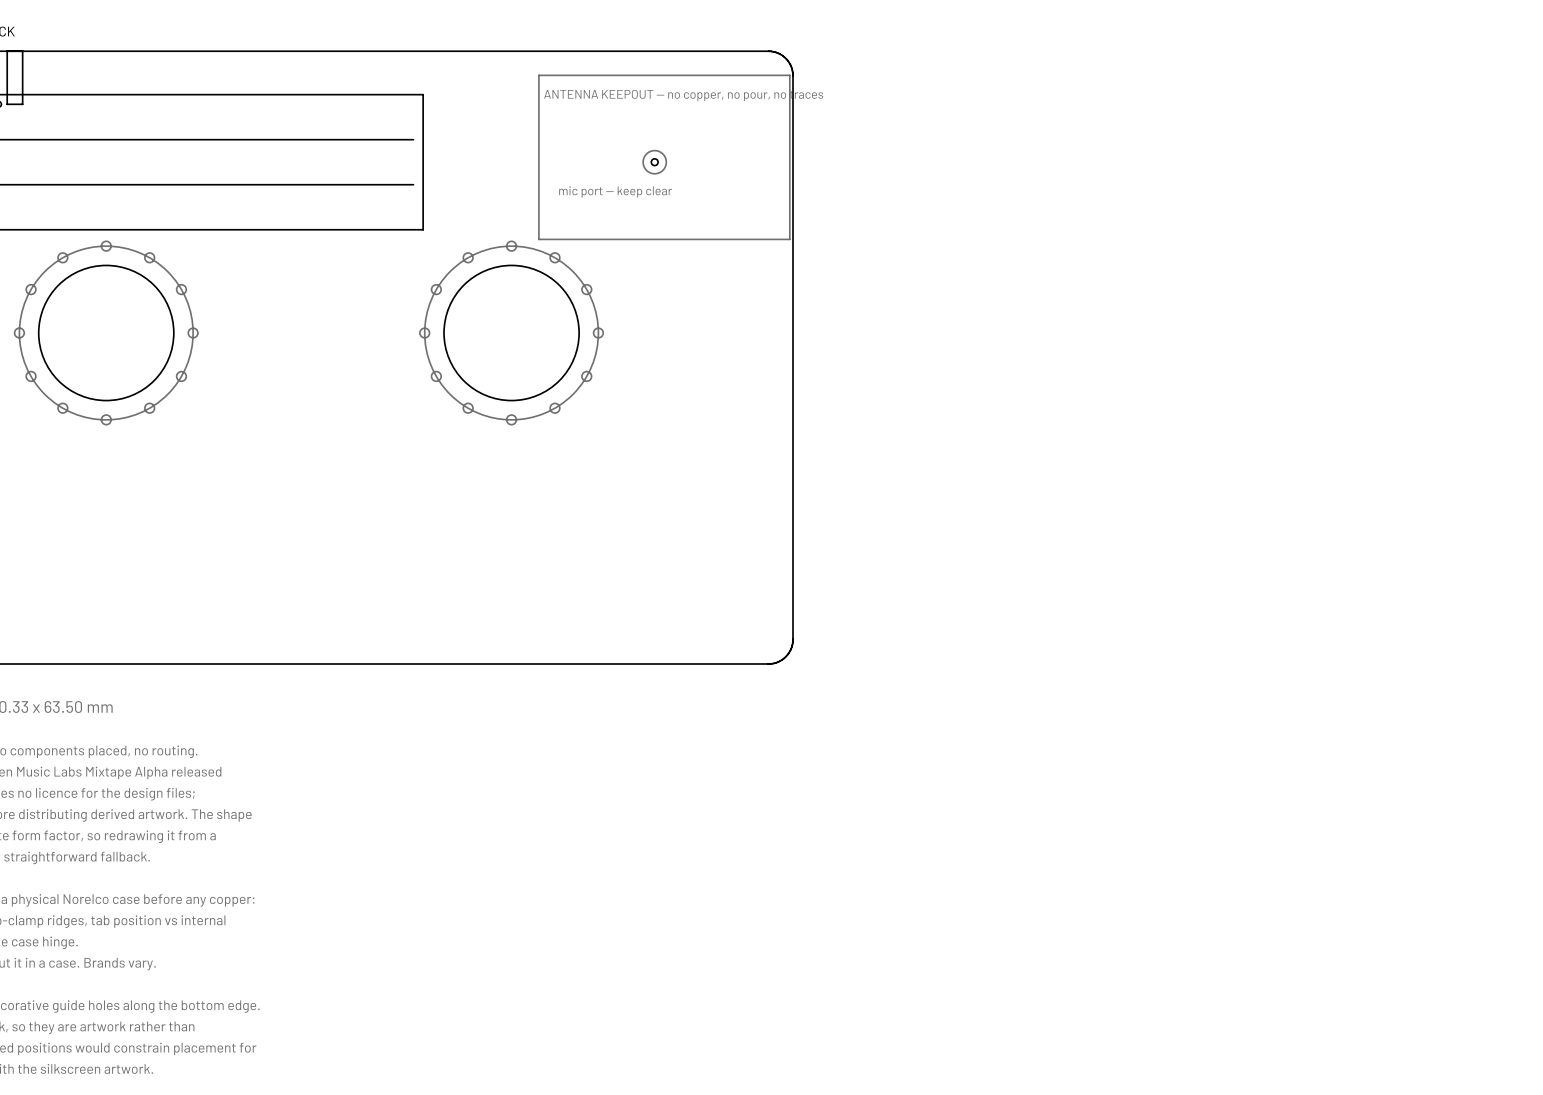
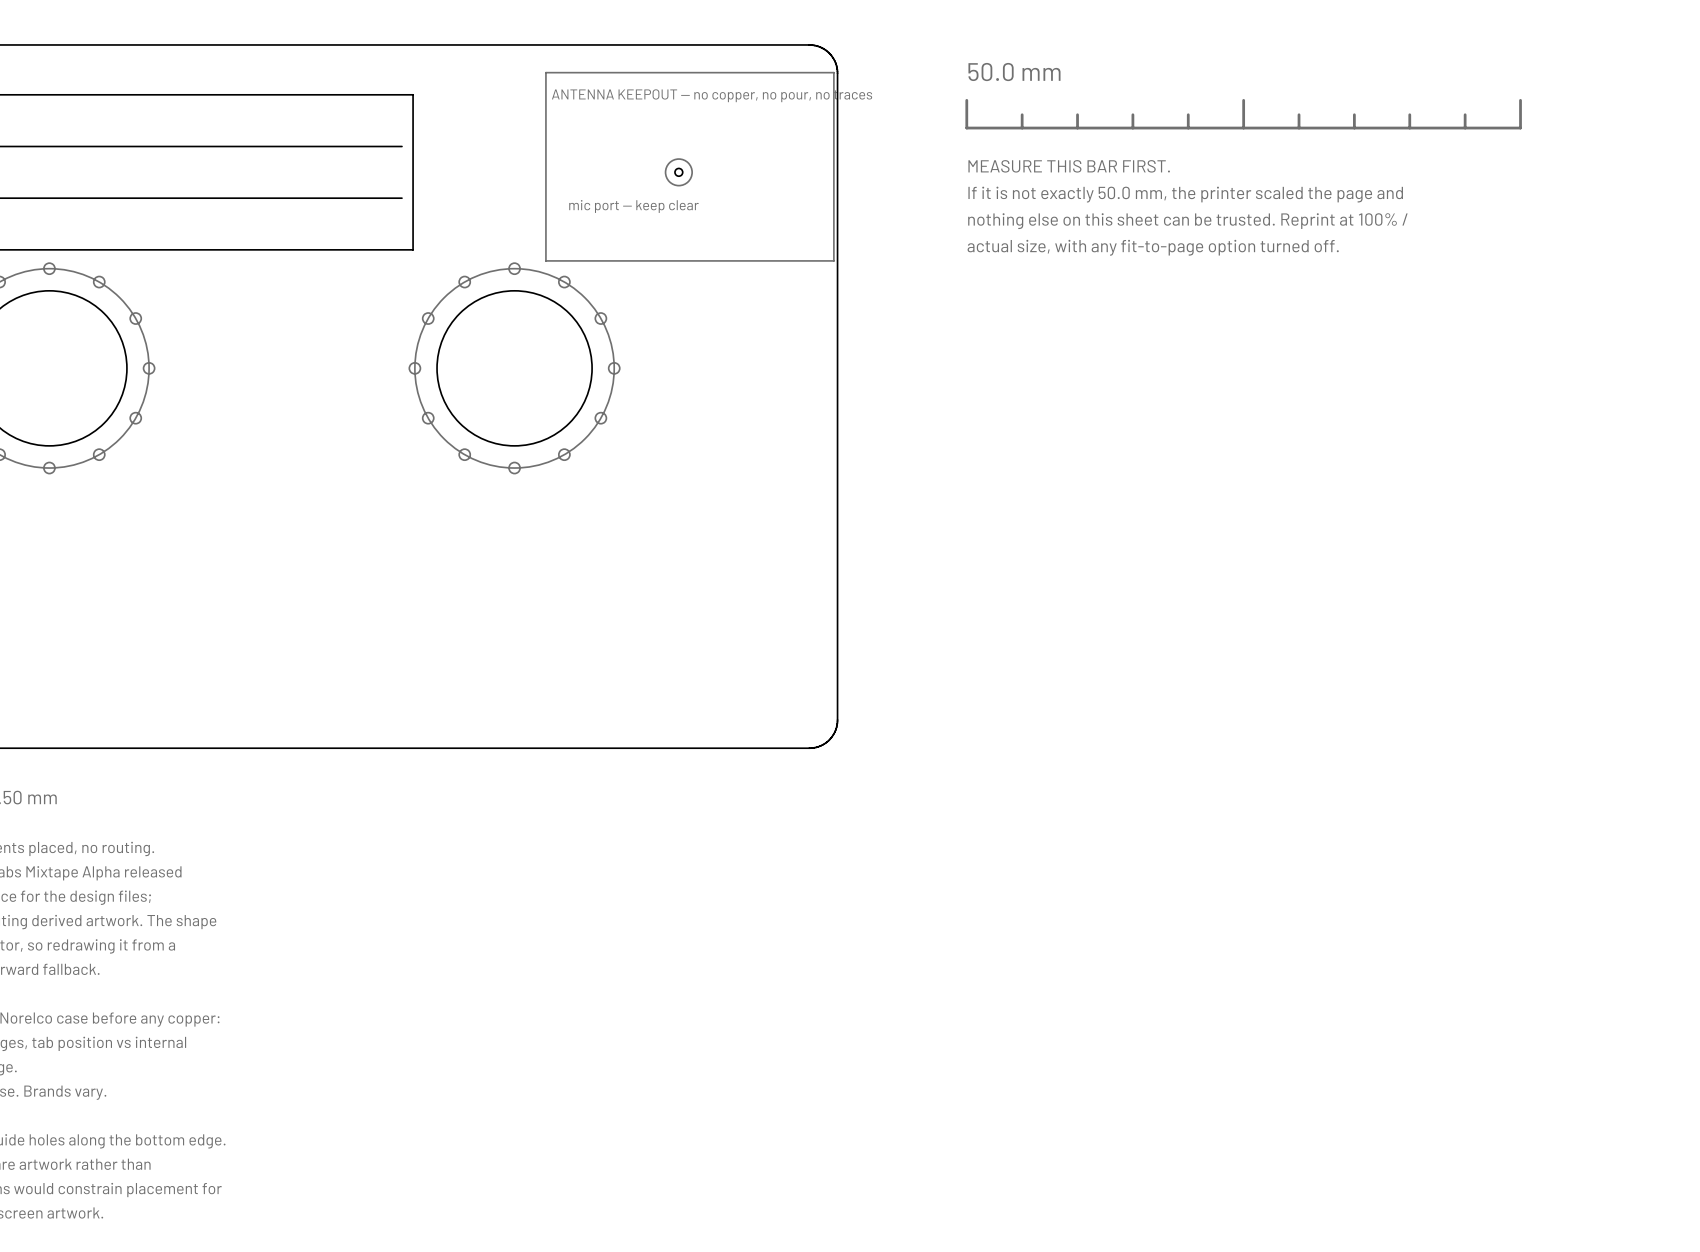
text: none -> 50.0 mm (1014, 72)
line: none -> (966, 100) (966, 128) (1520, 128) (1520, 100)
line: none -> (1243, 100) (1243, 128)
line: none -> (1022, 114) (1022, 128)
line: none -> (1077, 114) (1077, 128)
line: none -> (1132, 114) (1132, 128)
line: none -> (1188, 114) (1188, 128)
line: none -> (1299, 114) (1299, 128)
line: none -> (1354, 114) (1354, 128)
line: none -> (1409, 114) (1409, 128)
line: none -> (1465, 114) (1465, 128)
text: none -> MEASURE THIS BAR FIRST. (1069, 166)
text: none -> If it is not exactly 50.0 mm, the printer scaled the page and (1185, 194)
text: none -> nothing else on this sheet can be trusted. Reprint at 100% / (1187, 221)
text: none -> actual size, with any fit-to-page option turned off. (1153, 247)

